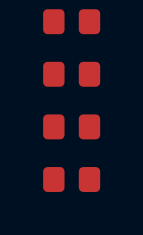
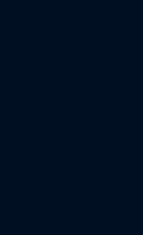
part: (71, 21) -> none
part: (71, 74) -> none
part: (71, 126) -> none
part: (71, 179) -> none

